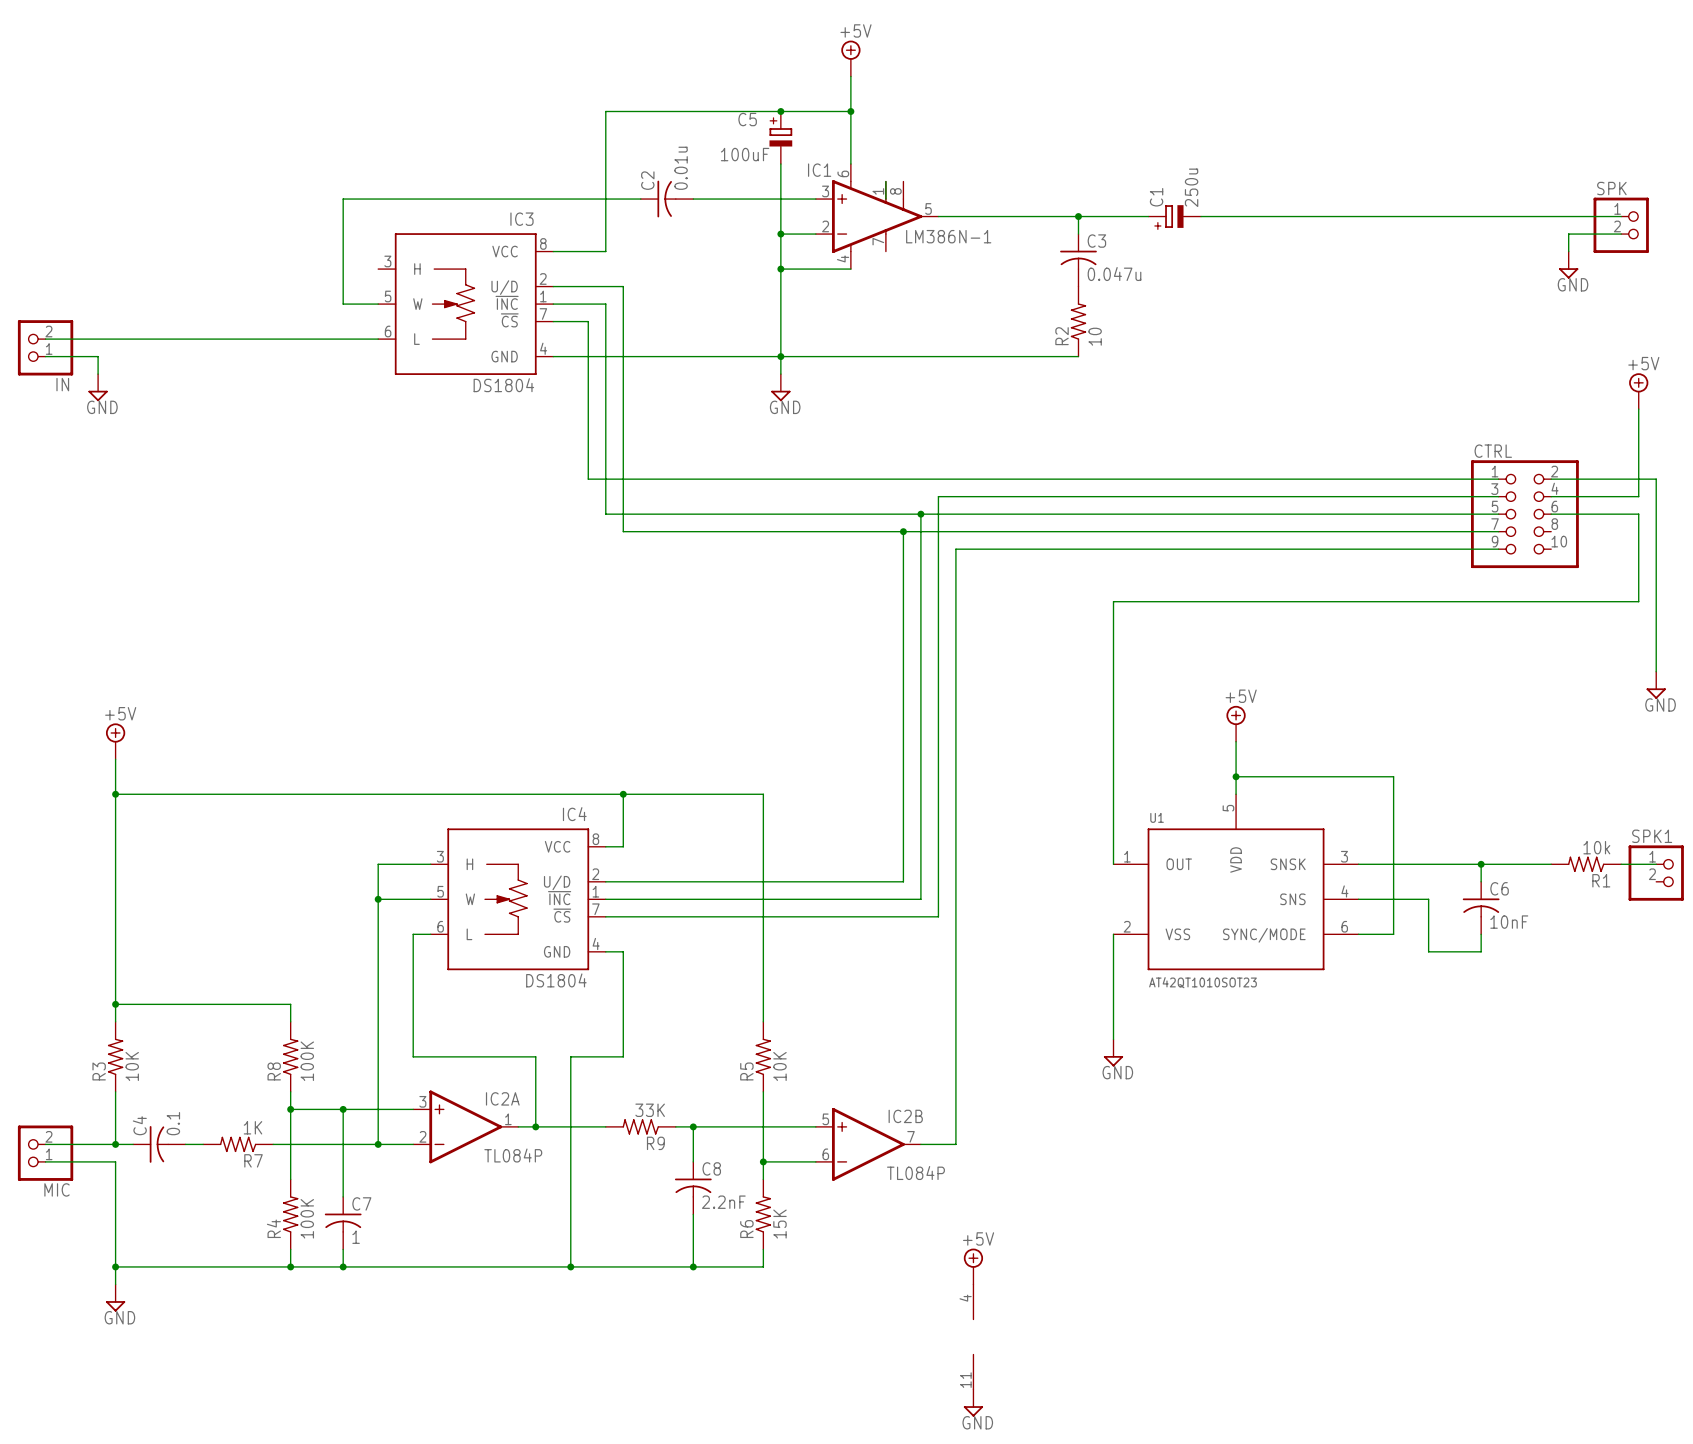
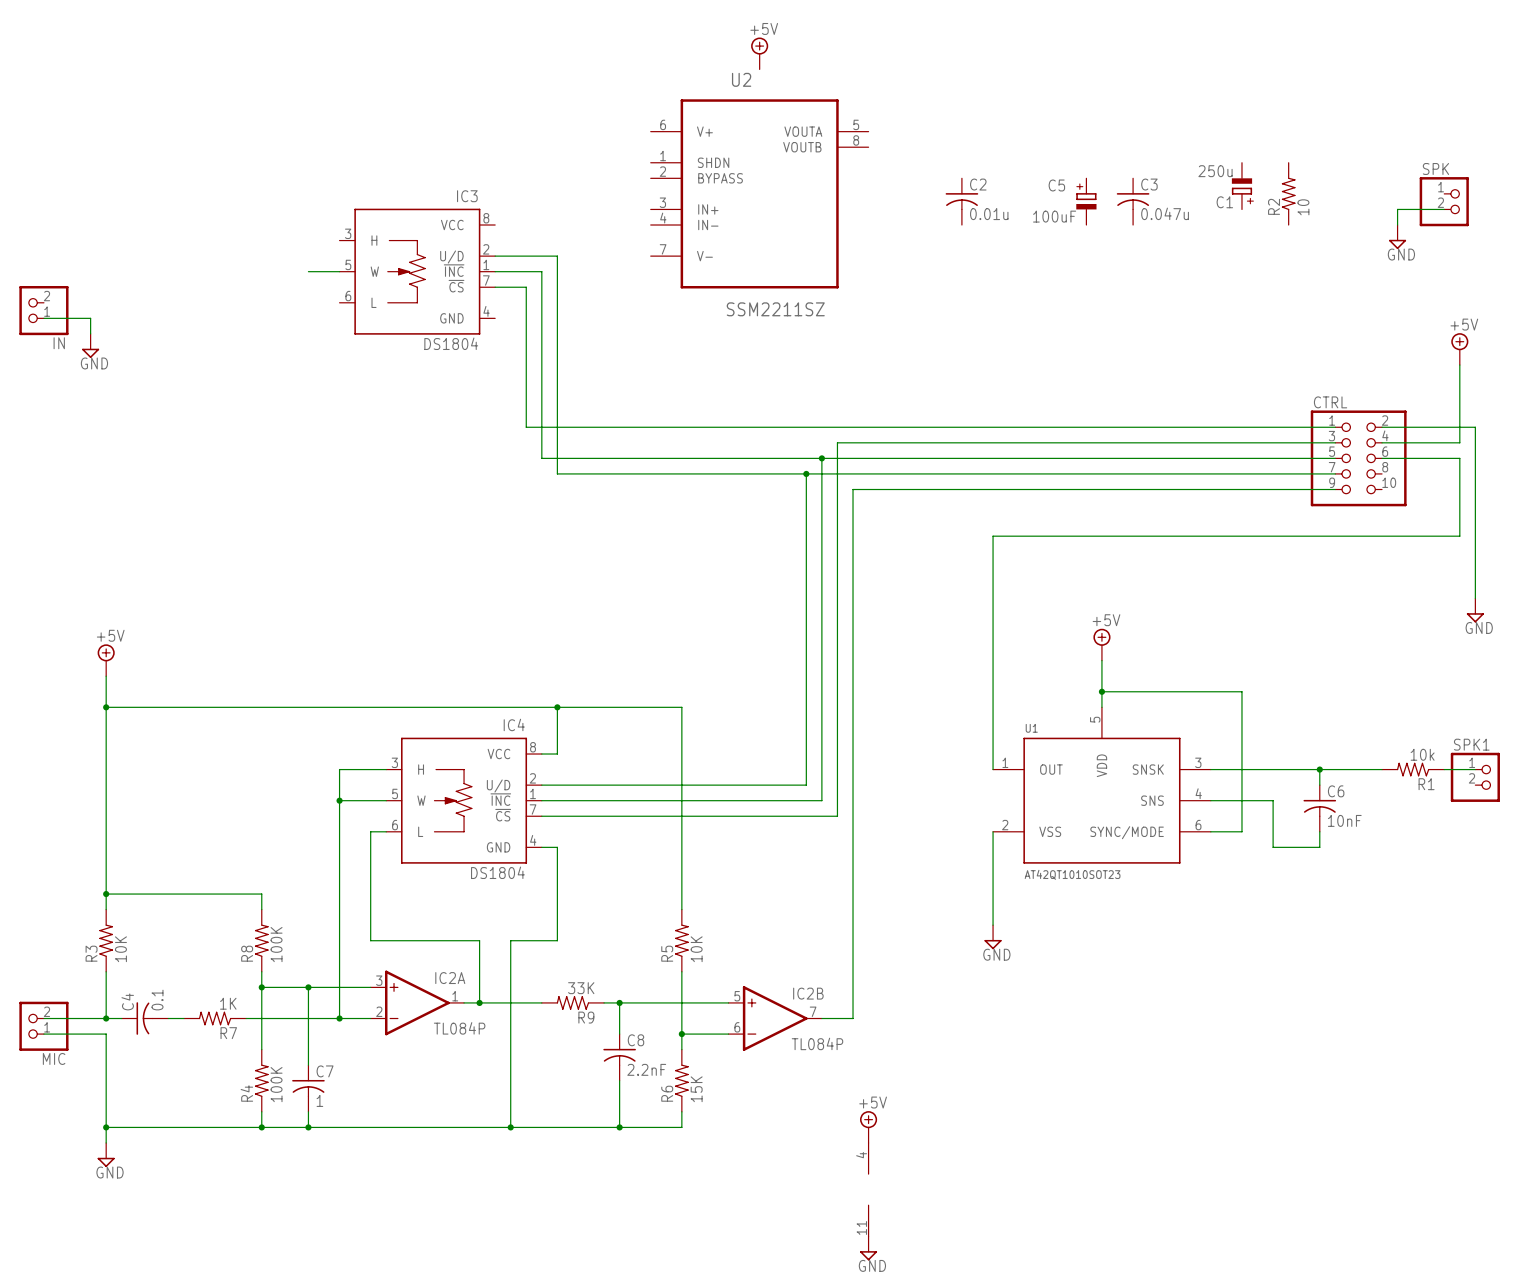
wire: (850, 76) (850, 164) -> none
junction: (780, 111) -> none
wire: (850, 111) (605, 111) (605, 251) (553, 251) -> none
junction: (850, 111) -> none
C5 position: (780, 137) -> (1086, 201)
wire: (780, 164) (780, 374) -> none
wire: (885, 181) (885, 199) -> none
wire: (640, 199) (343, 199) (343, 304) -> none
C2 rotation: 0° (666, 199) -> 90° clockwise (961, 201)
C2 position: (667, 199) -> (961, 201)
wire: (693, 199) (815, 199) -> none
U2: none -> SSM2211SZ (759, 193)
IC1: LM386N-1 (877, 216) -> none
wire: (938, 216) (1148, 216) -> none
junction: (1078, 216) -> none
C1 rotation: 0° (1174, 216) -> 90° counterclockwise (1241, 186)
C1 position: (1174, 216) -> (1241, 186)
wire: (1201, 216) (1621, 216) -> none
wire: (780, 234) (815, 234) -> none
junction: (780, 234) -> none
C3 position: (1078, 260) -> (1133, 201)
wire: (780, 269) (850, 269) -> none
junction: (780, 269) -> none
R2 position: (1078, 321) -> (1288, 193)
wire: (45, 339) (378, 339) -> none
wire: (553, 356) (1078, 356) -> none
junction: (780, 356) -> none
power symbol: GND (780, 387) -> none

